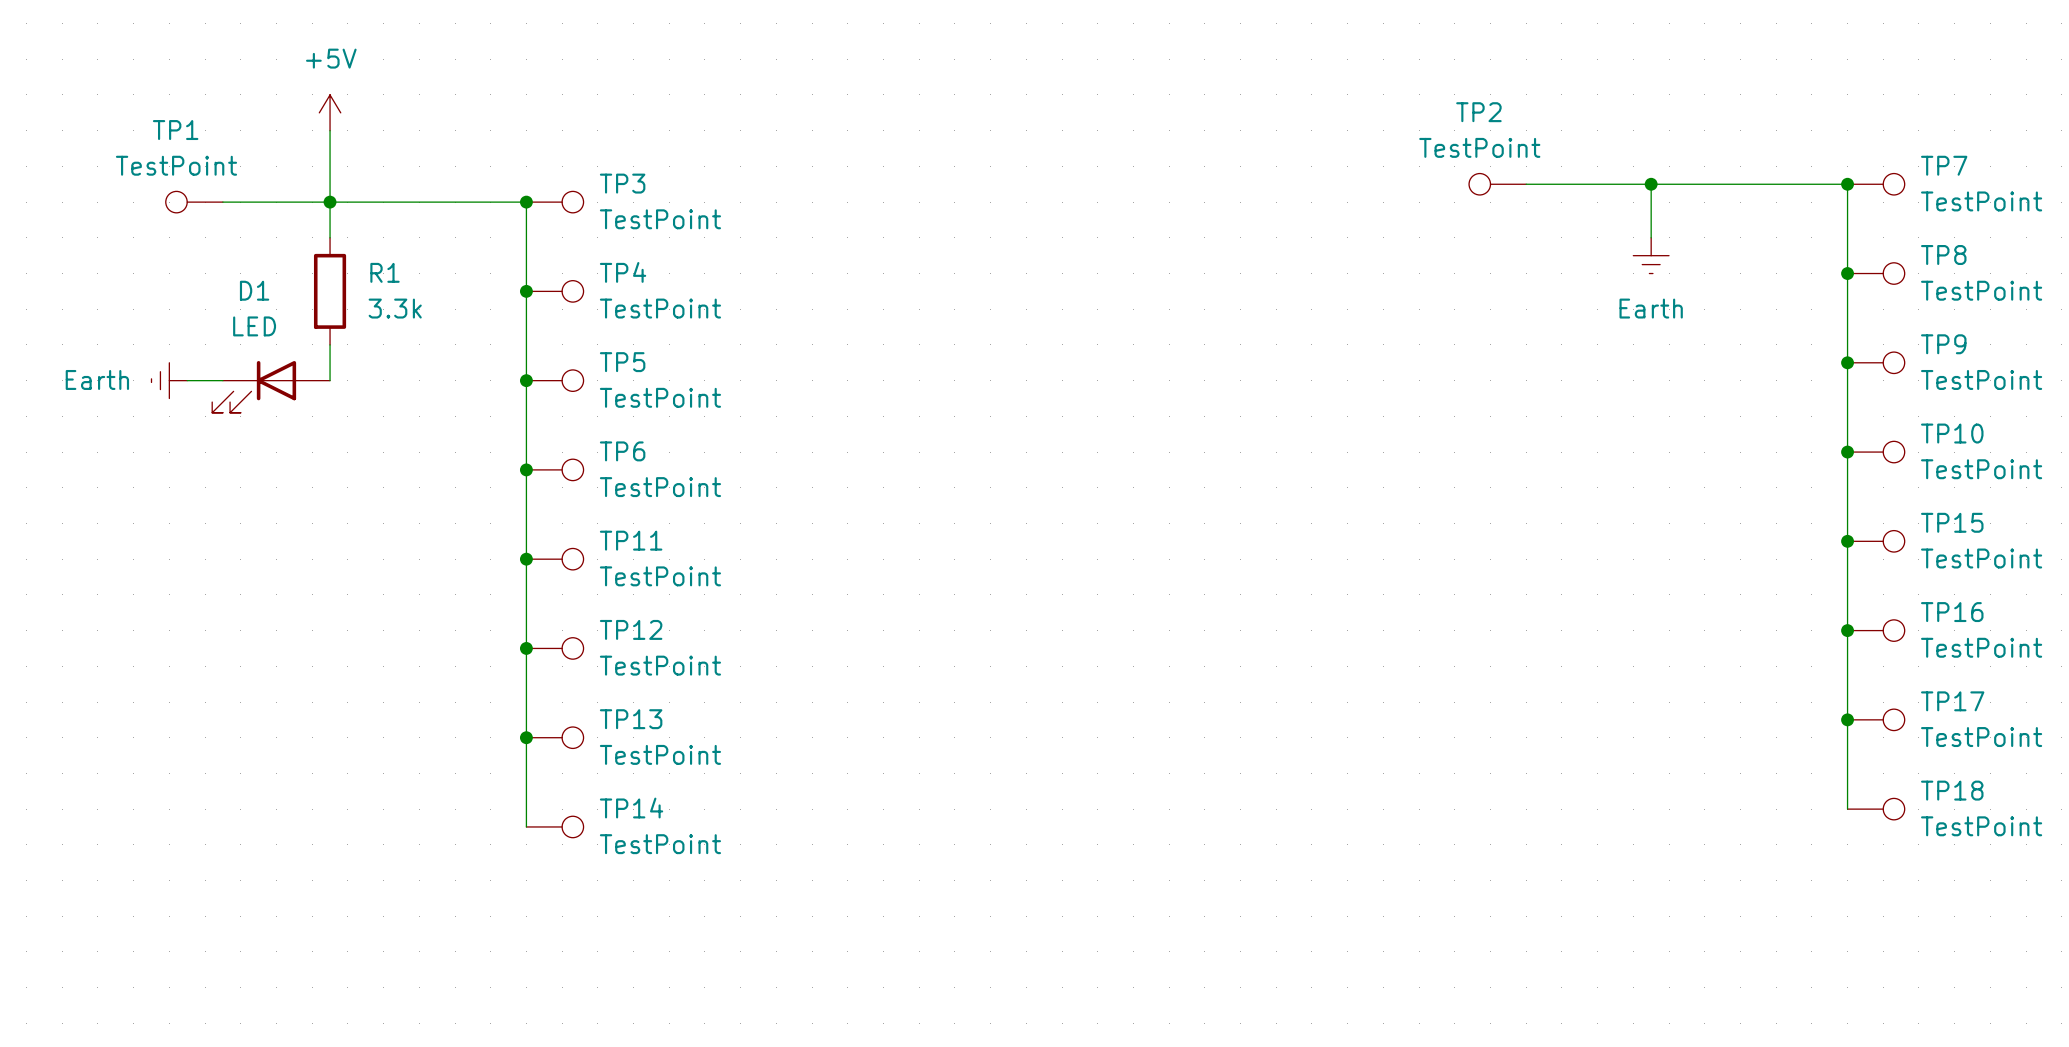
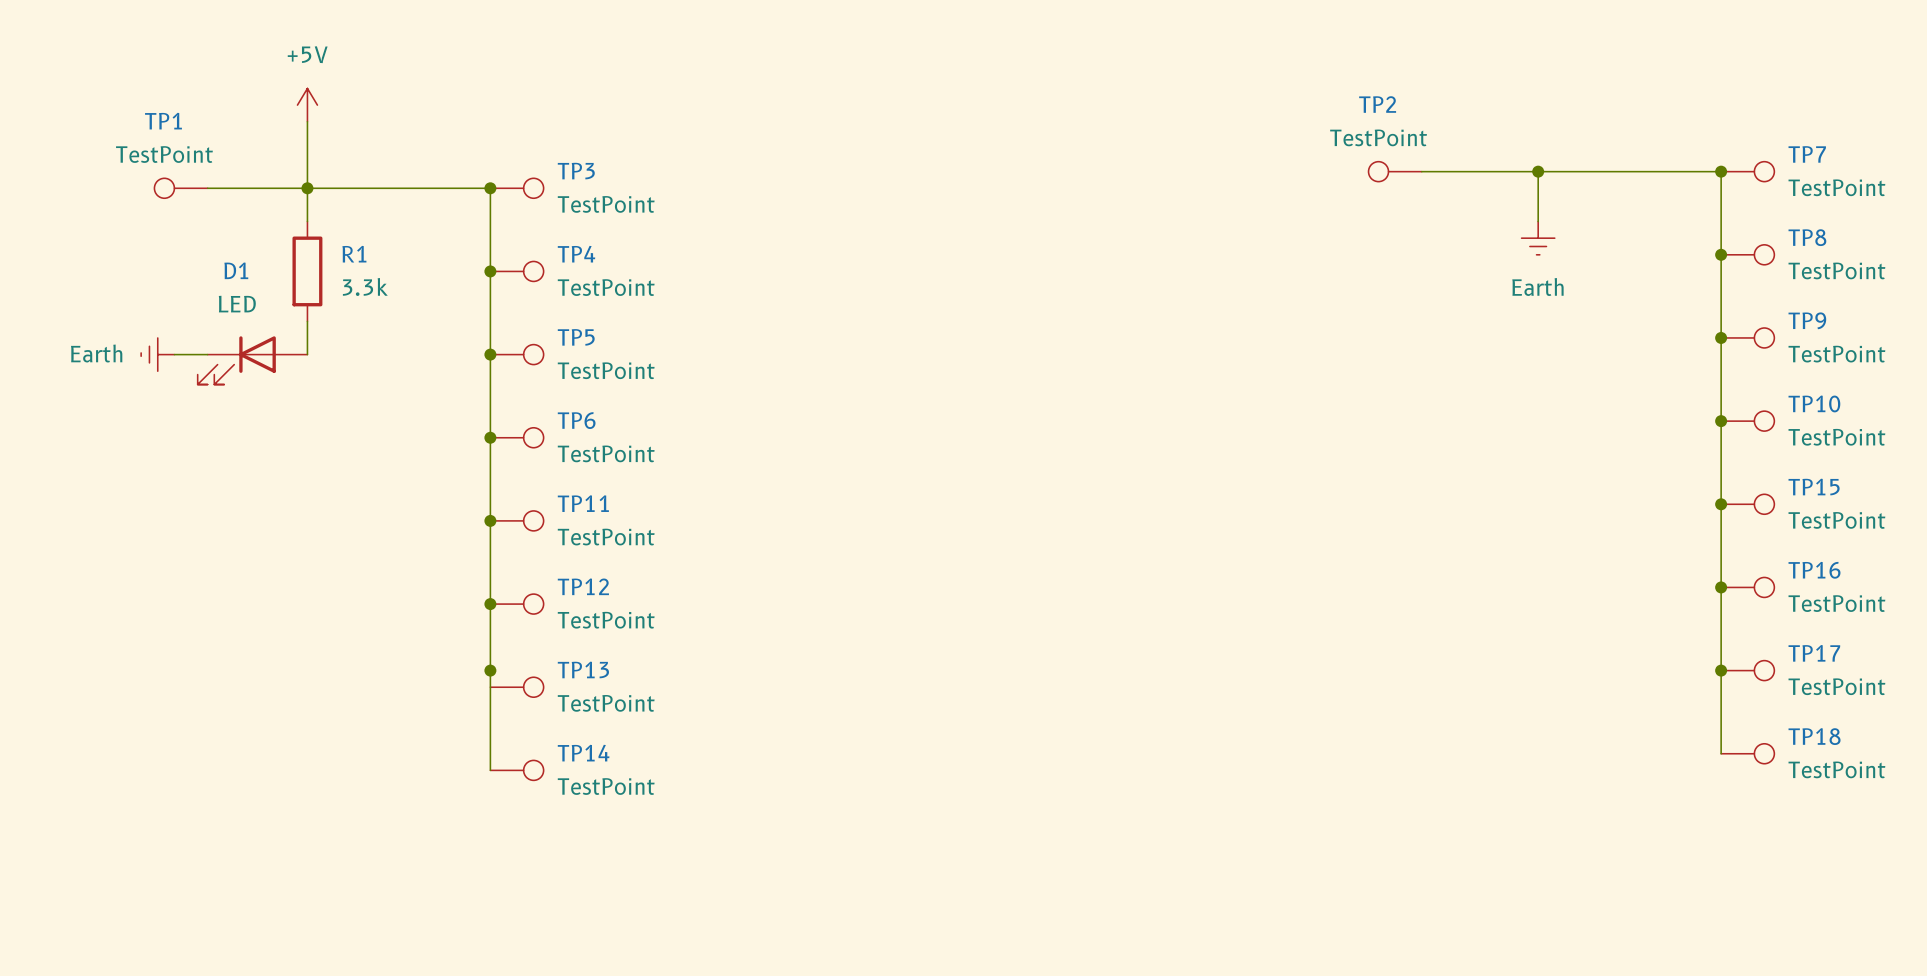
junction position: (526, 737) -> (490, 670)

